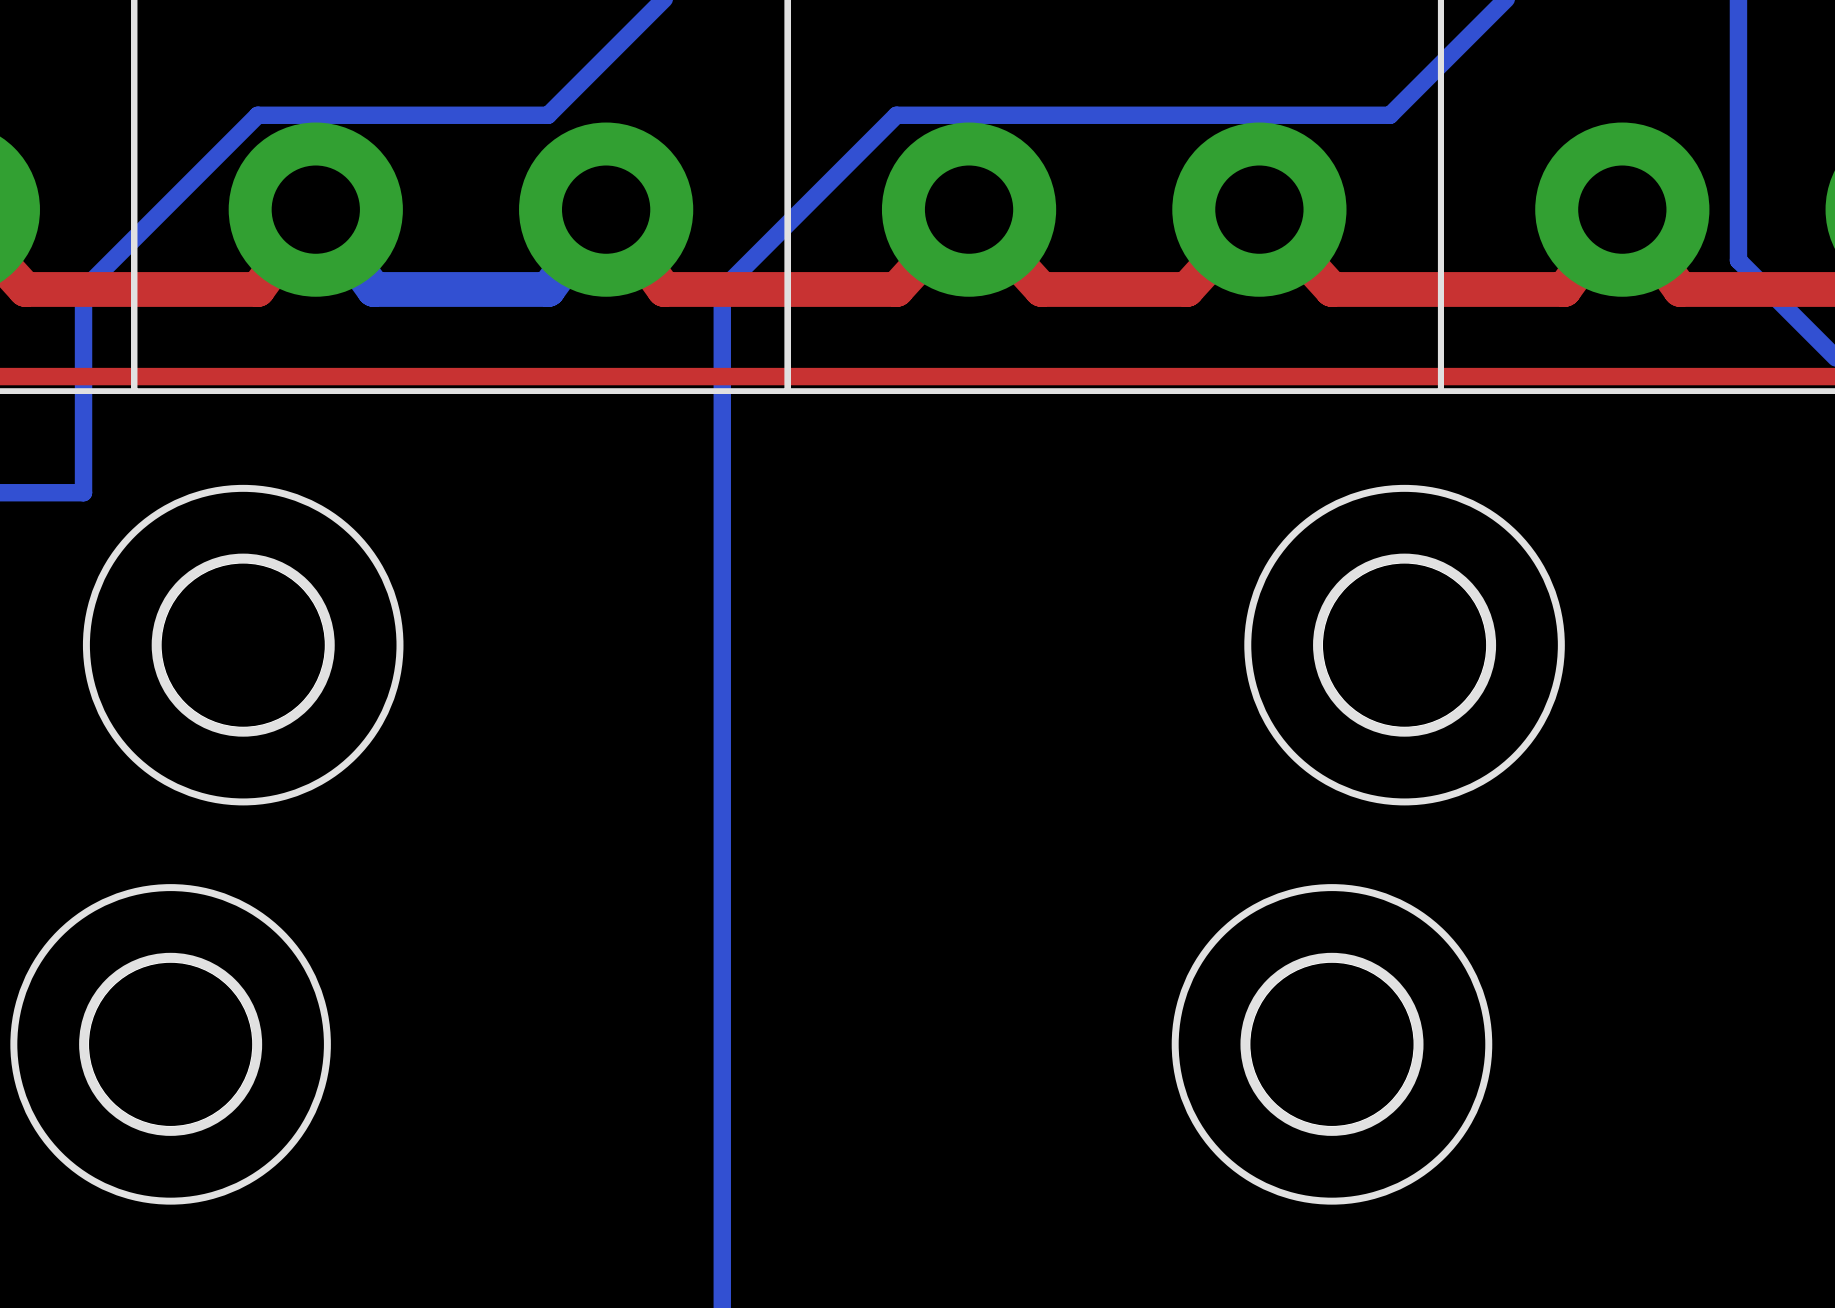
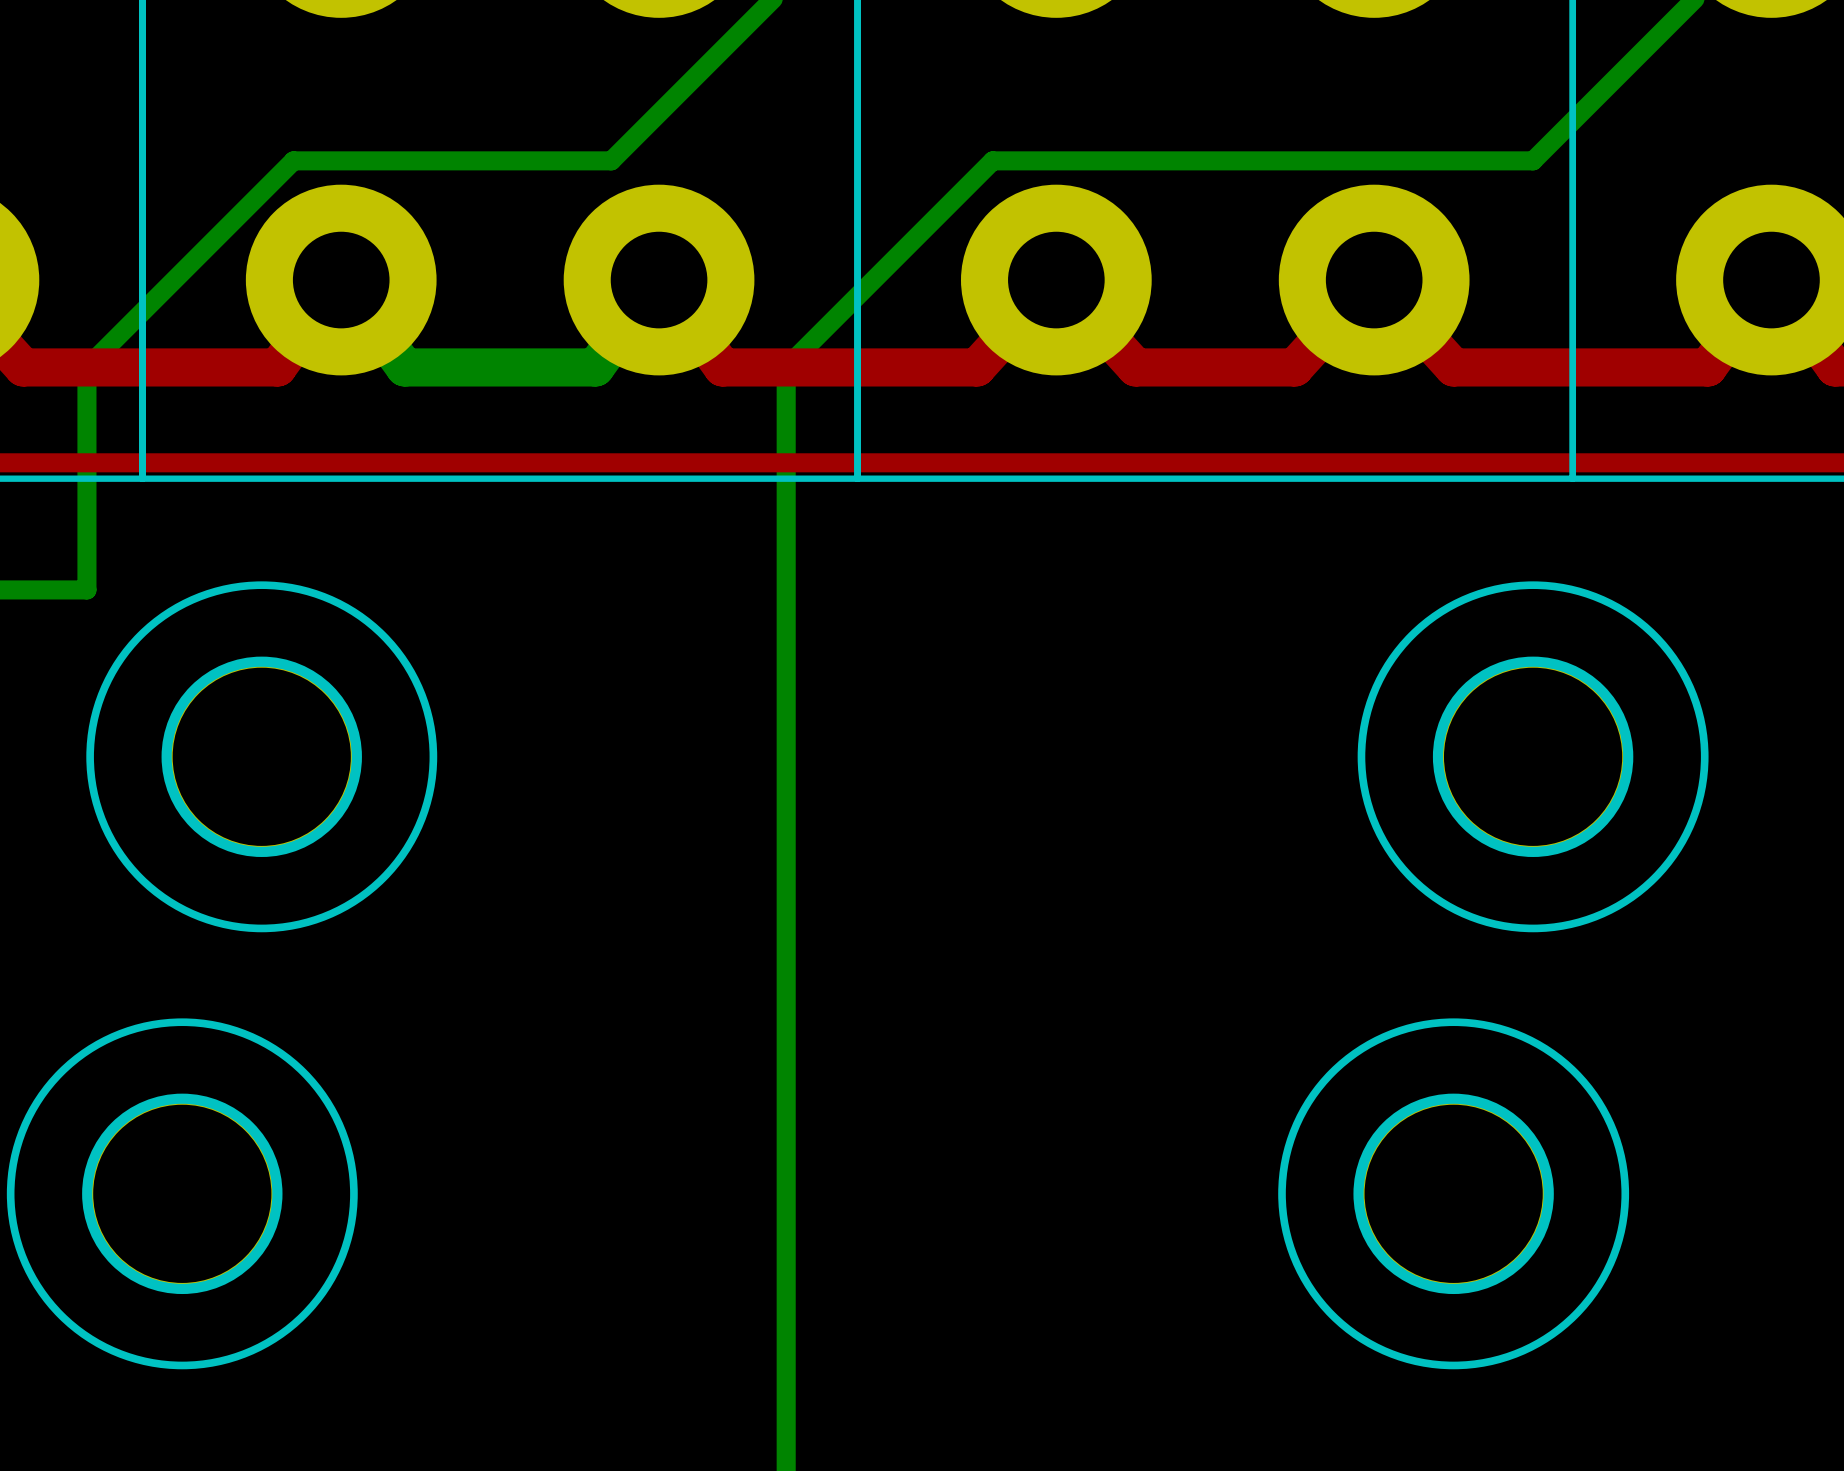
bottom track: (562, 100) (548, 115) (257, 115) -> (611, 160) (293, 160) (277, 176)
bottom track: (1404, 100) (1390, 115) (896, 115) -> (1533, 160) (992, 160) (976, 176)

